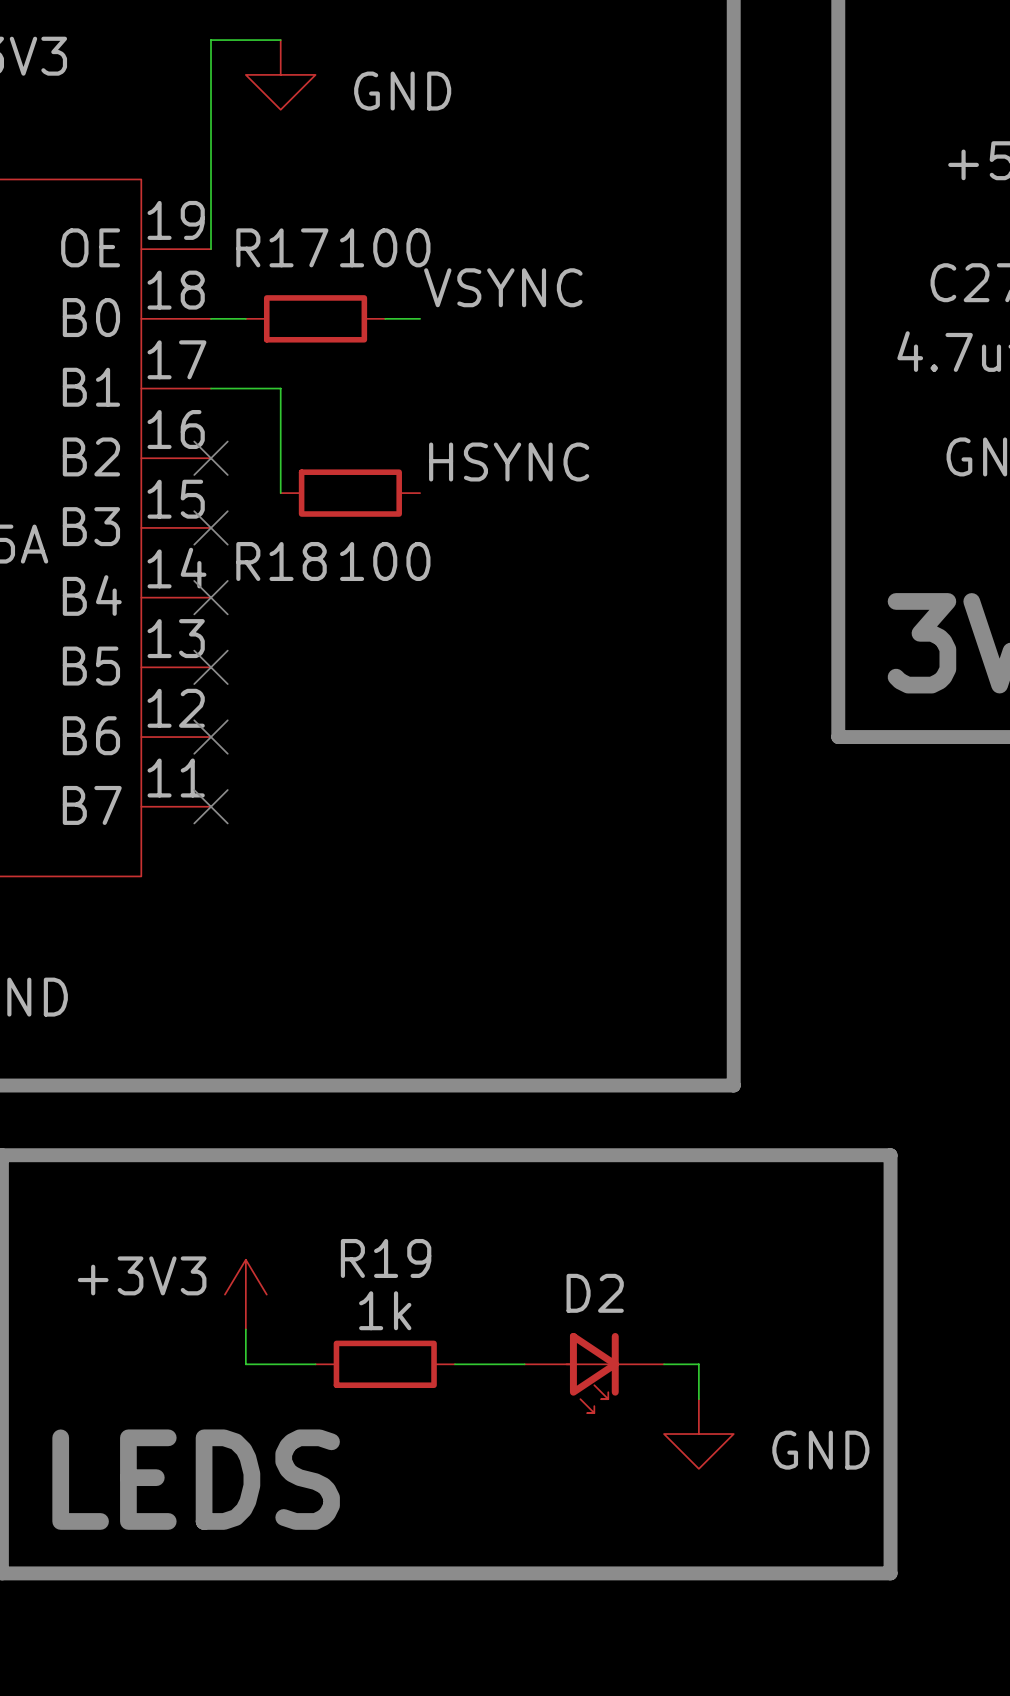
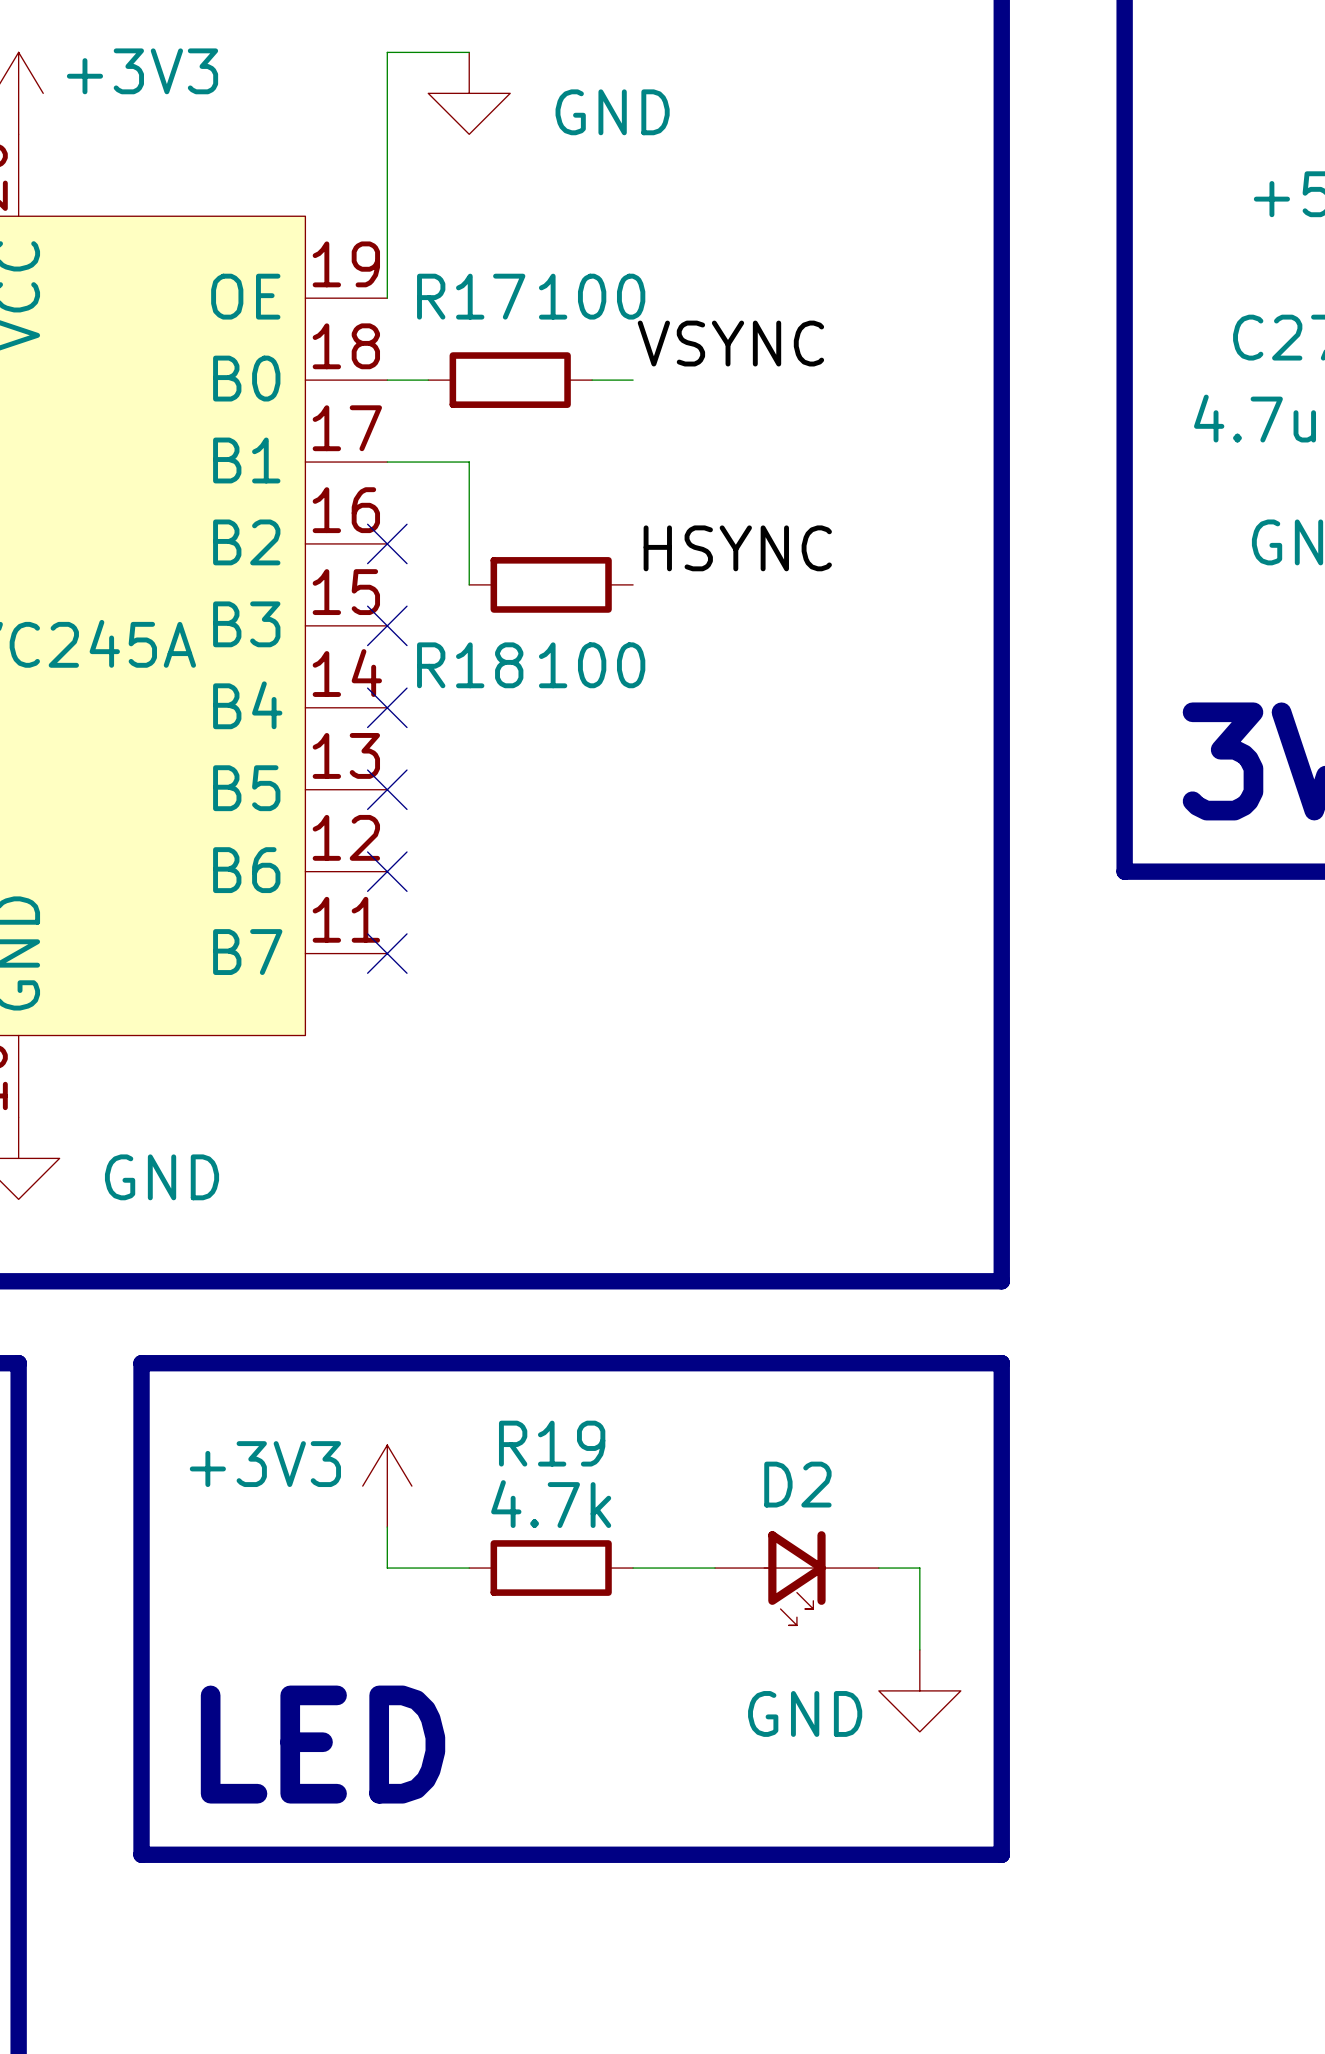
line: (733, 1155) (890, 1155) (890, 1573) (733, 1573) -> (1001, 1363) (1001, 1854)
power symbol position: +3V3 (245, 1294) -> +3V3 (387, 1486)
R19 value: 1k (385, 1310) -> 4.7k (551, 1504)
wire: (245, 1329) (245, 1364) (315, 1364) -> (387, 1527) (387, 1568) (469, 1568)
wire: none -> (878, 1568) (919, 1568) (919, 1649)
R19 position: (385, 1364) -> (551, 1568)
wire: (454, 1364) (524, 1364) -> (633, 1568) (715, 1568)
wire: (664, 1364) (698, 1364) (698, 1399) -> none
D2 position: (594, 1373) -> (796, 1578)
power symbol position: GND (698, 1434) -> GND (919, 1690)
power symbol text position: GND (820, 1450) -> GND (805, 1713)
text: LEDS (196, 1479) -> LED (323, 1744)

